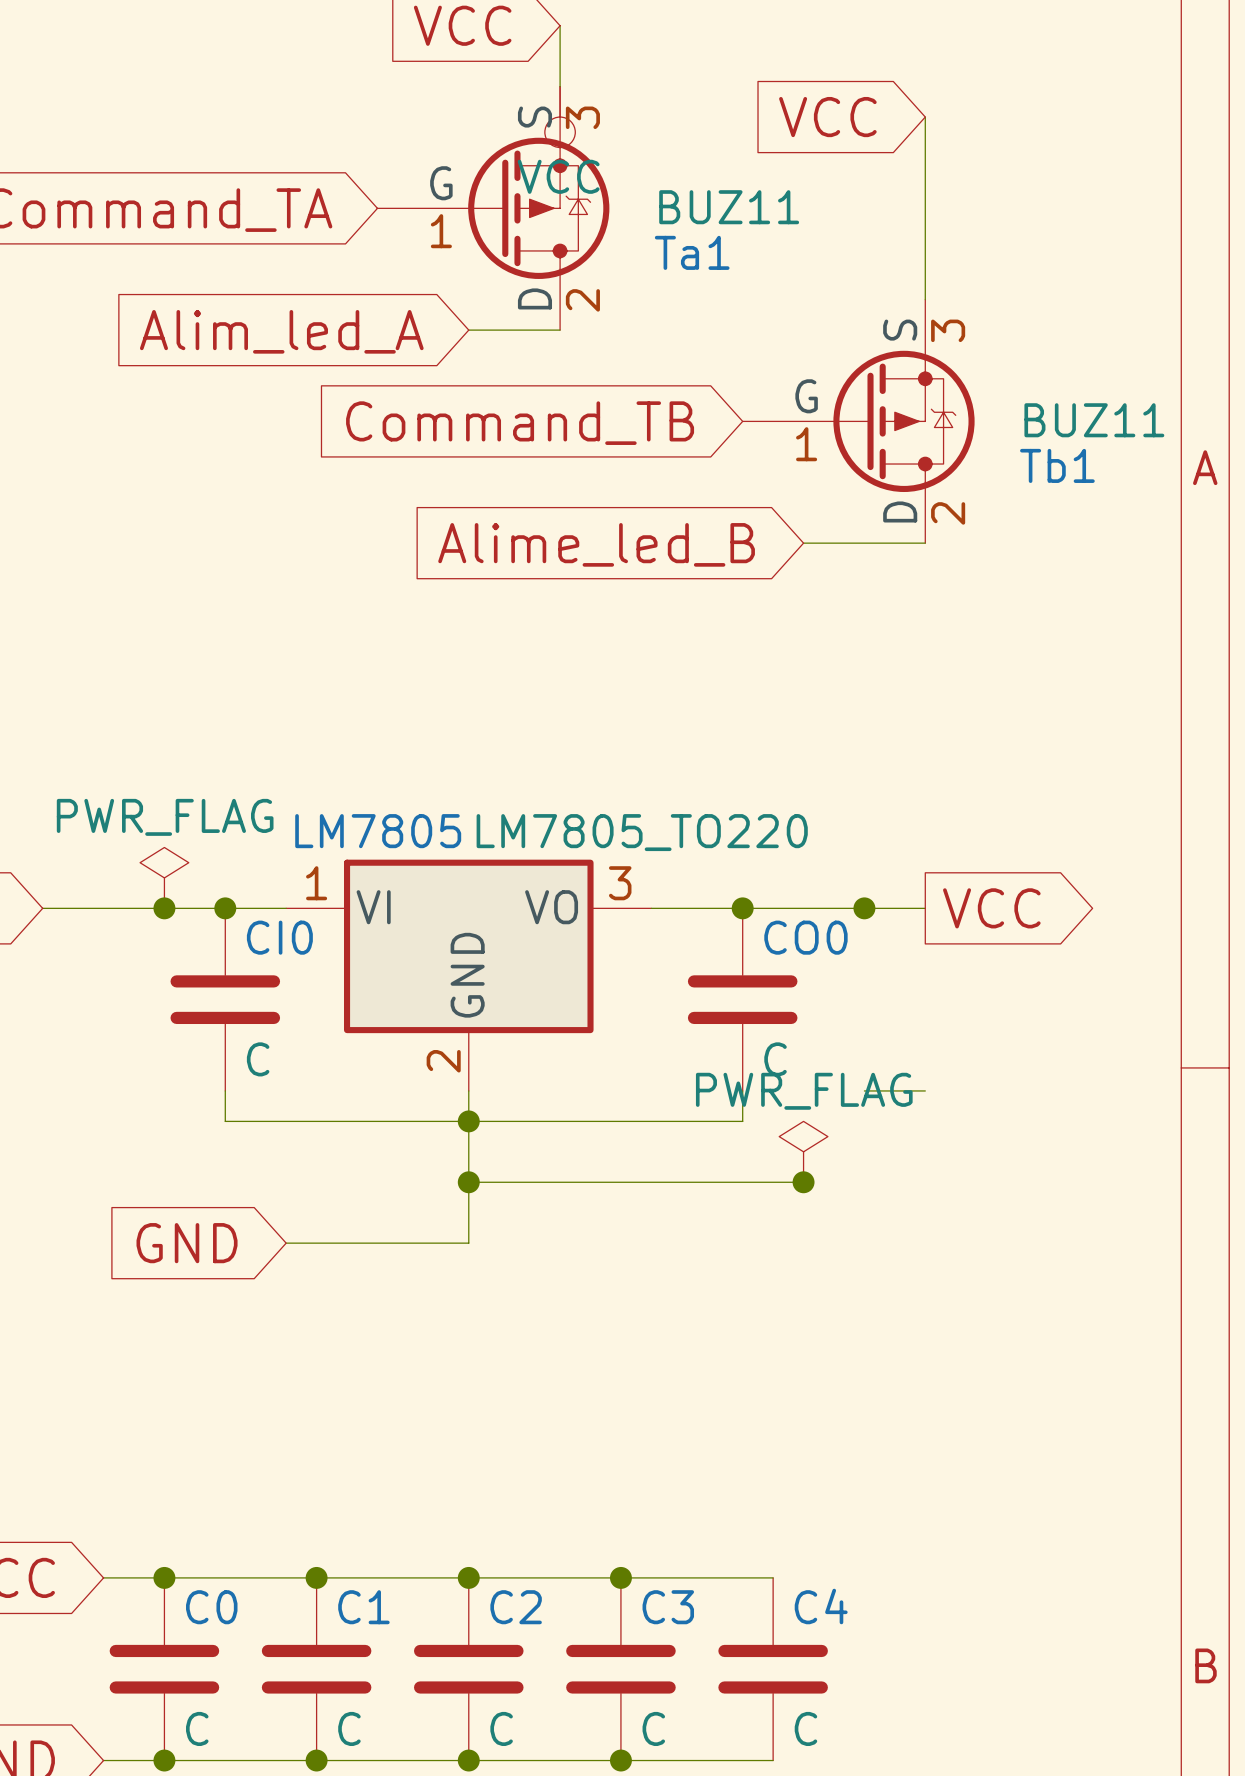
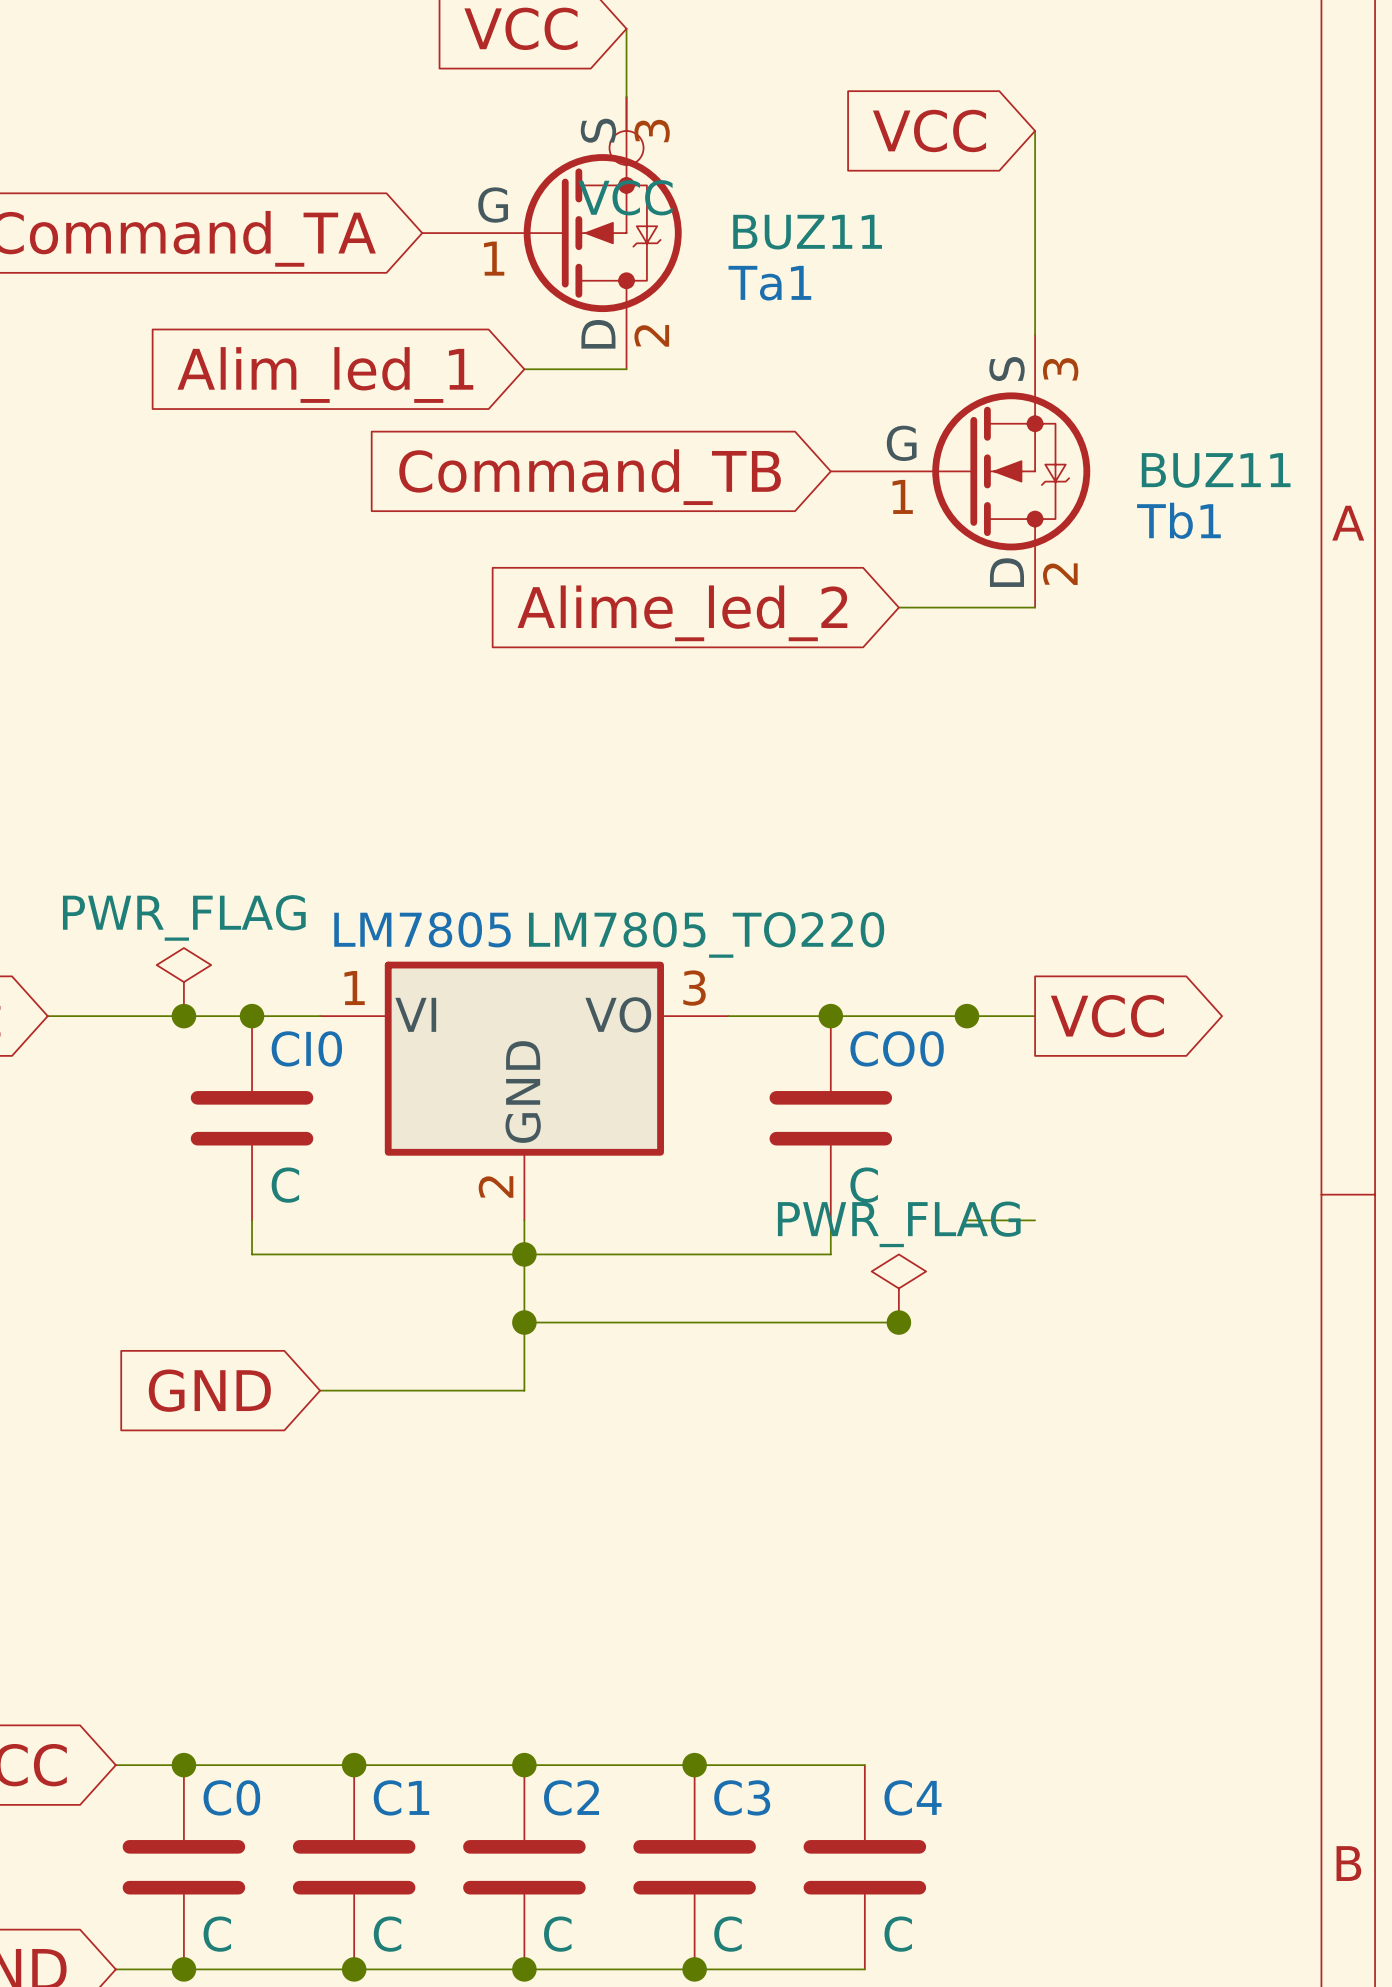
Ta1 symbol: [377, 86, 610, 331] -> [422, 96, 682, 370]
Tb1 symbol: [742, 299, 975, 544] -> [830, 335, 1091, 608]
global label: Alim_led_A (281, 331) -> Alim_led_1 (325, 375)
global label: Alime_led_B (596, 544) -> Alime_led_2 (682, 613)

